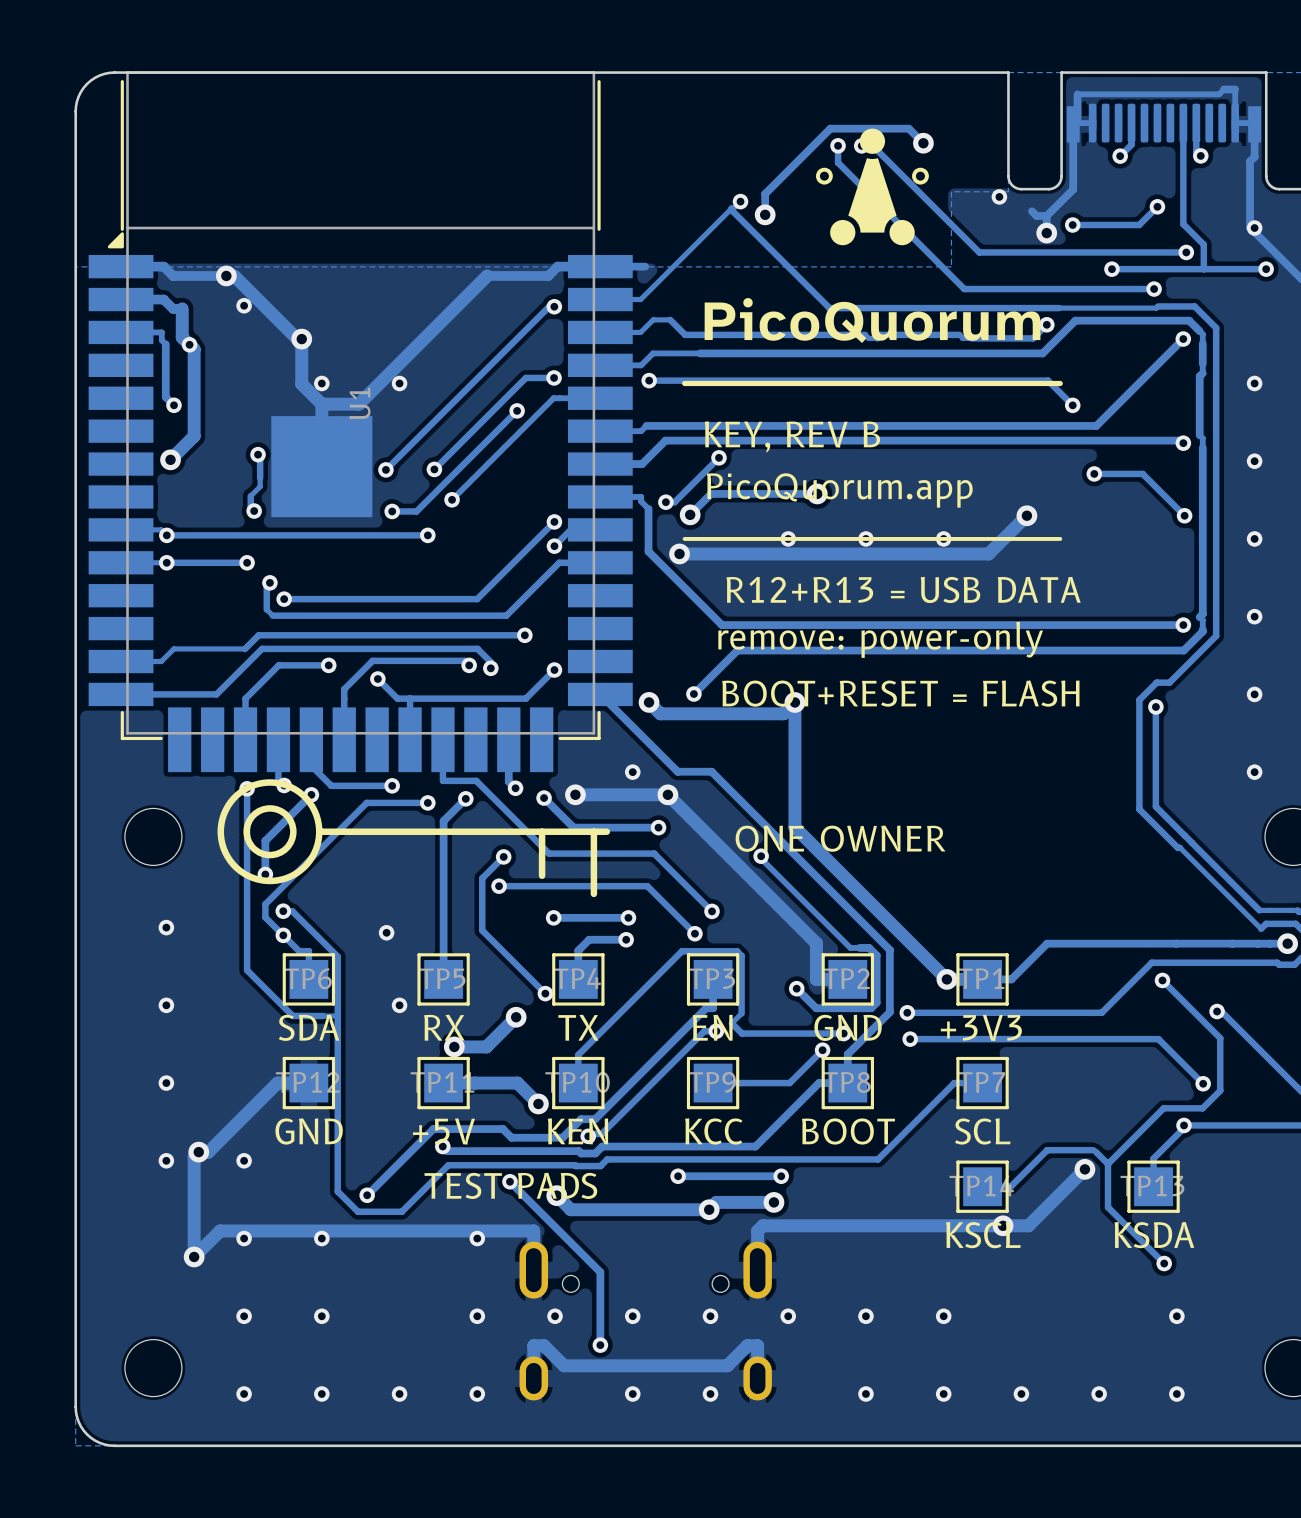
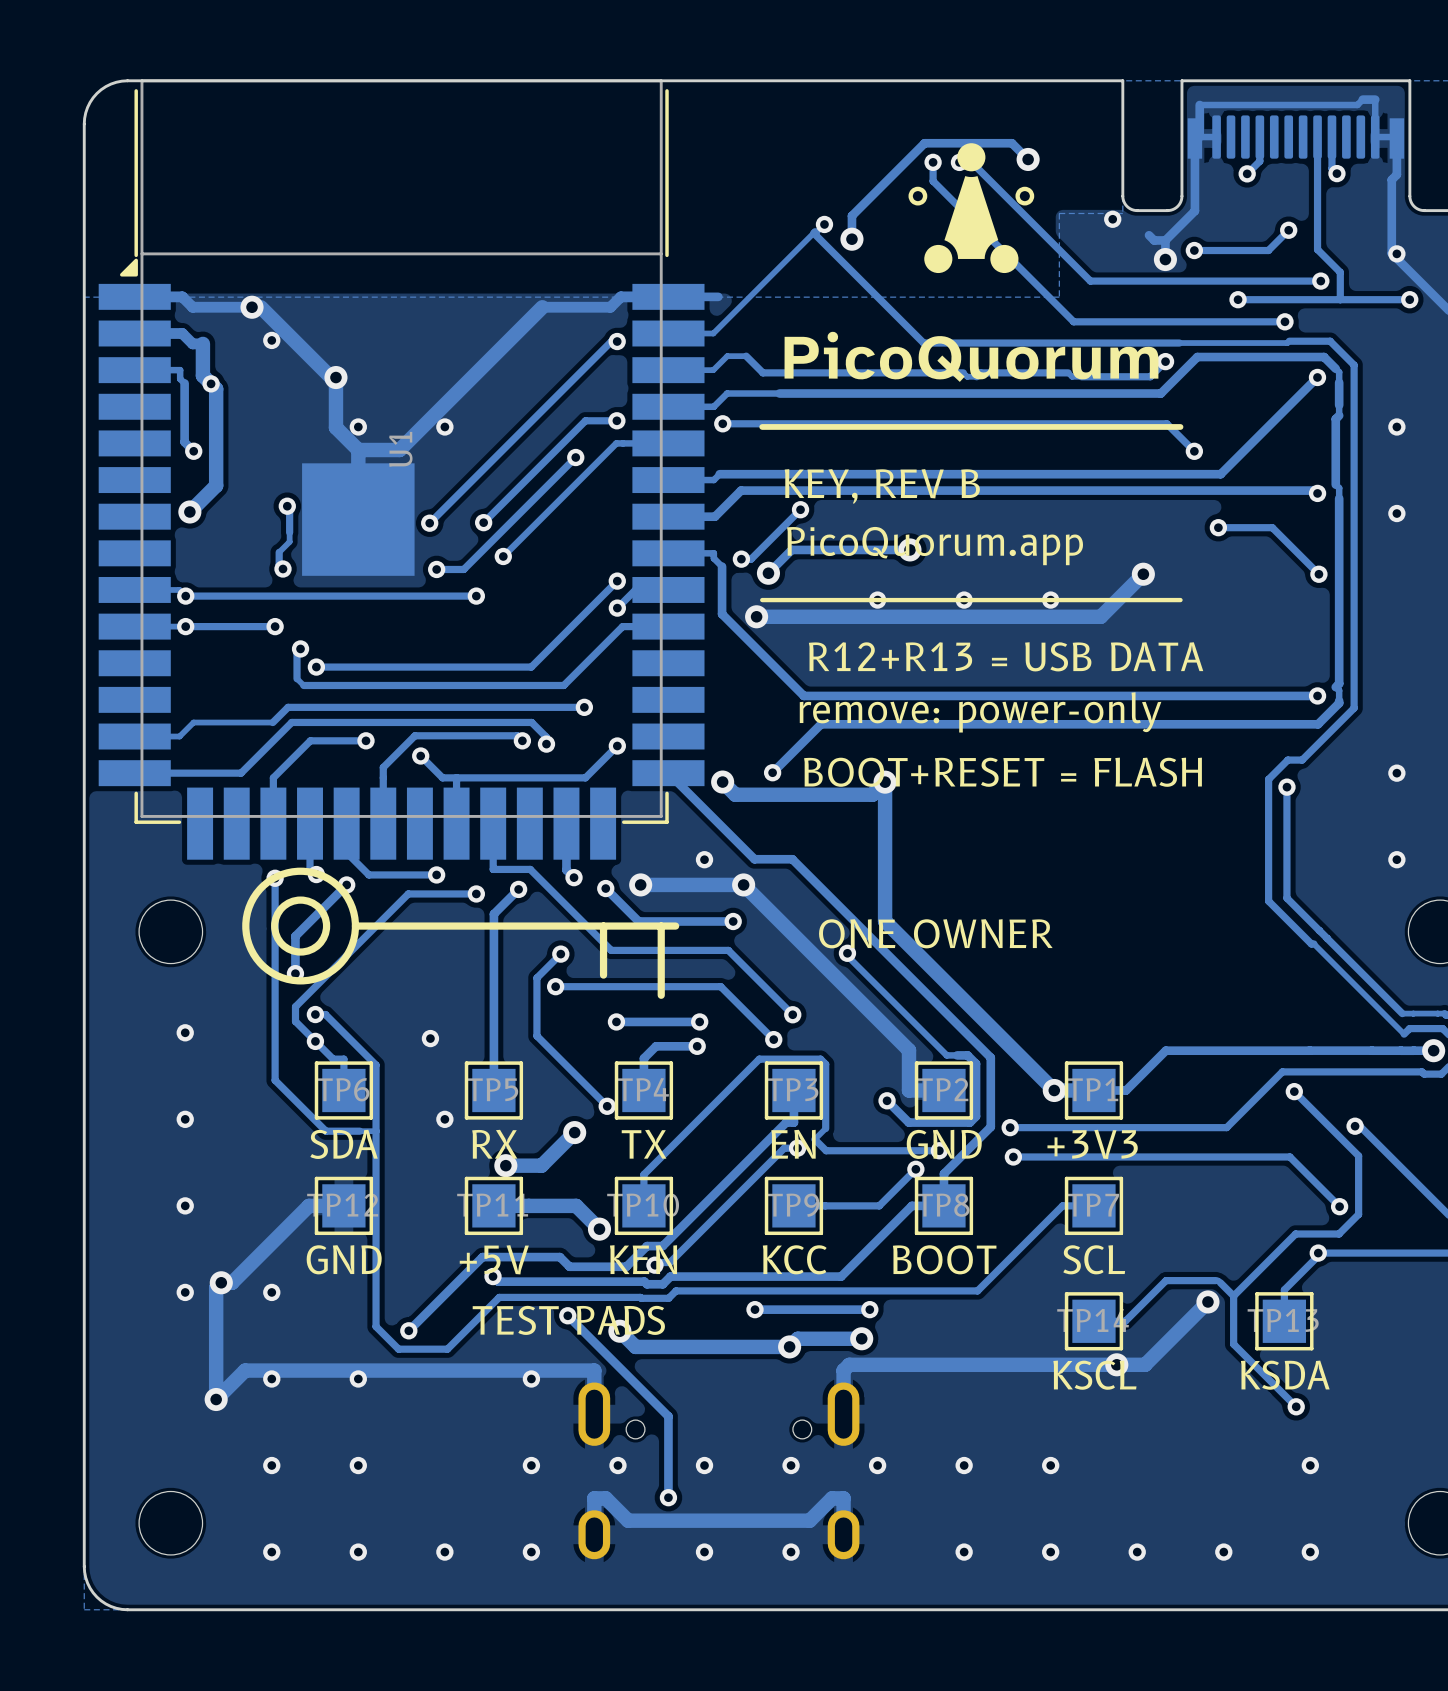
via: (1254, 538) -> none
via: (1254, 616) -> none

